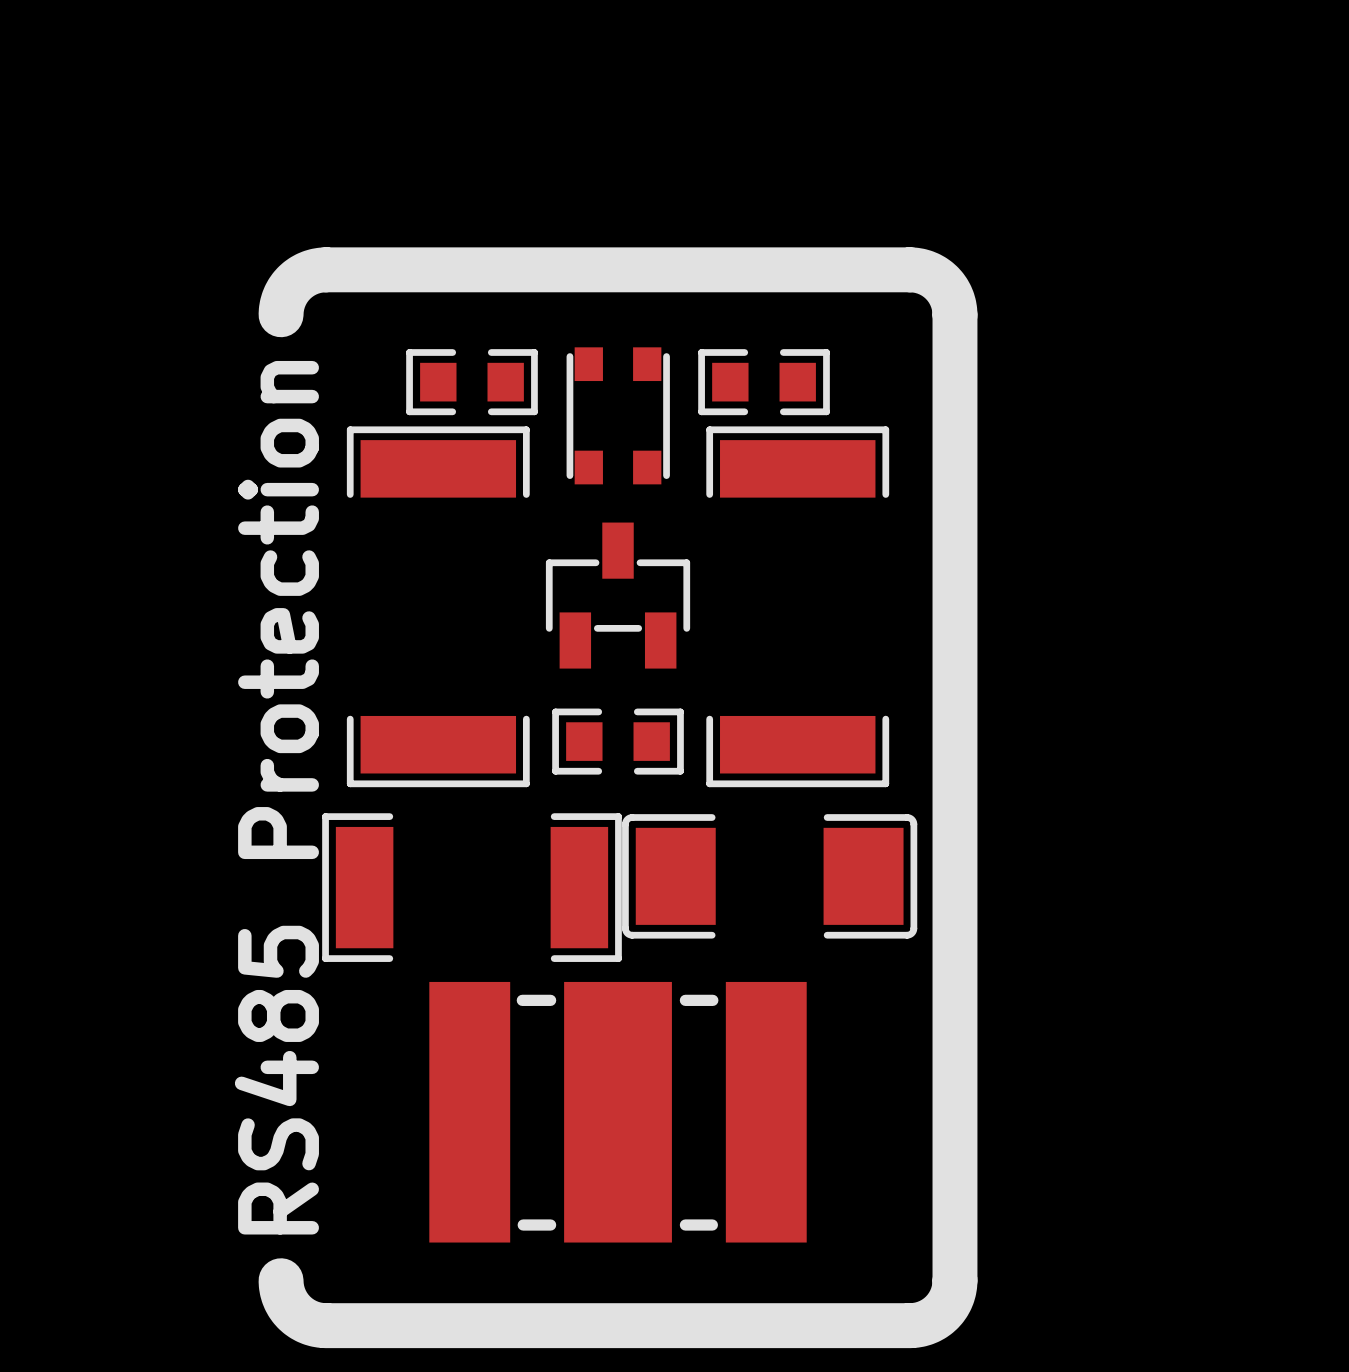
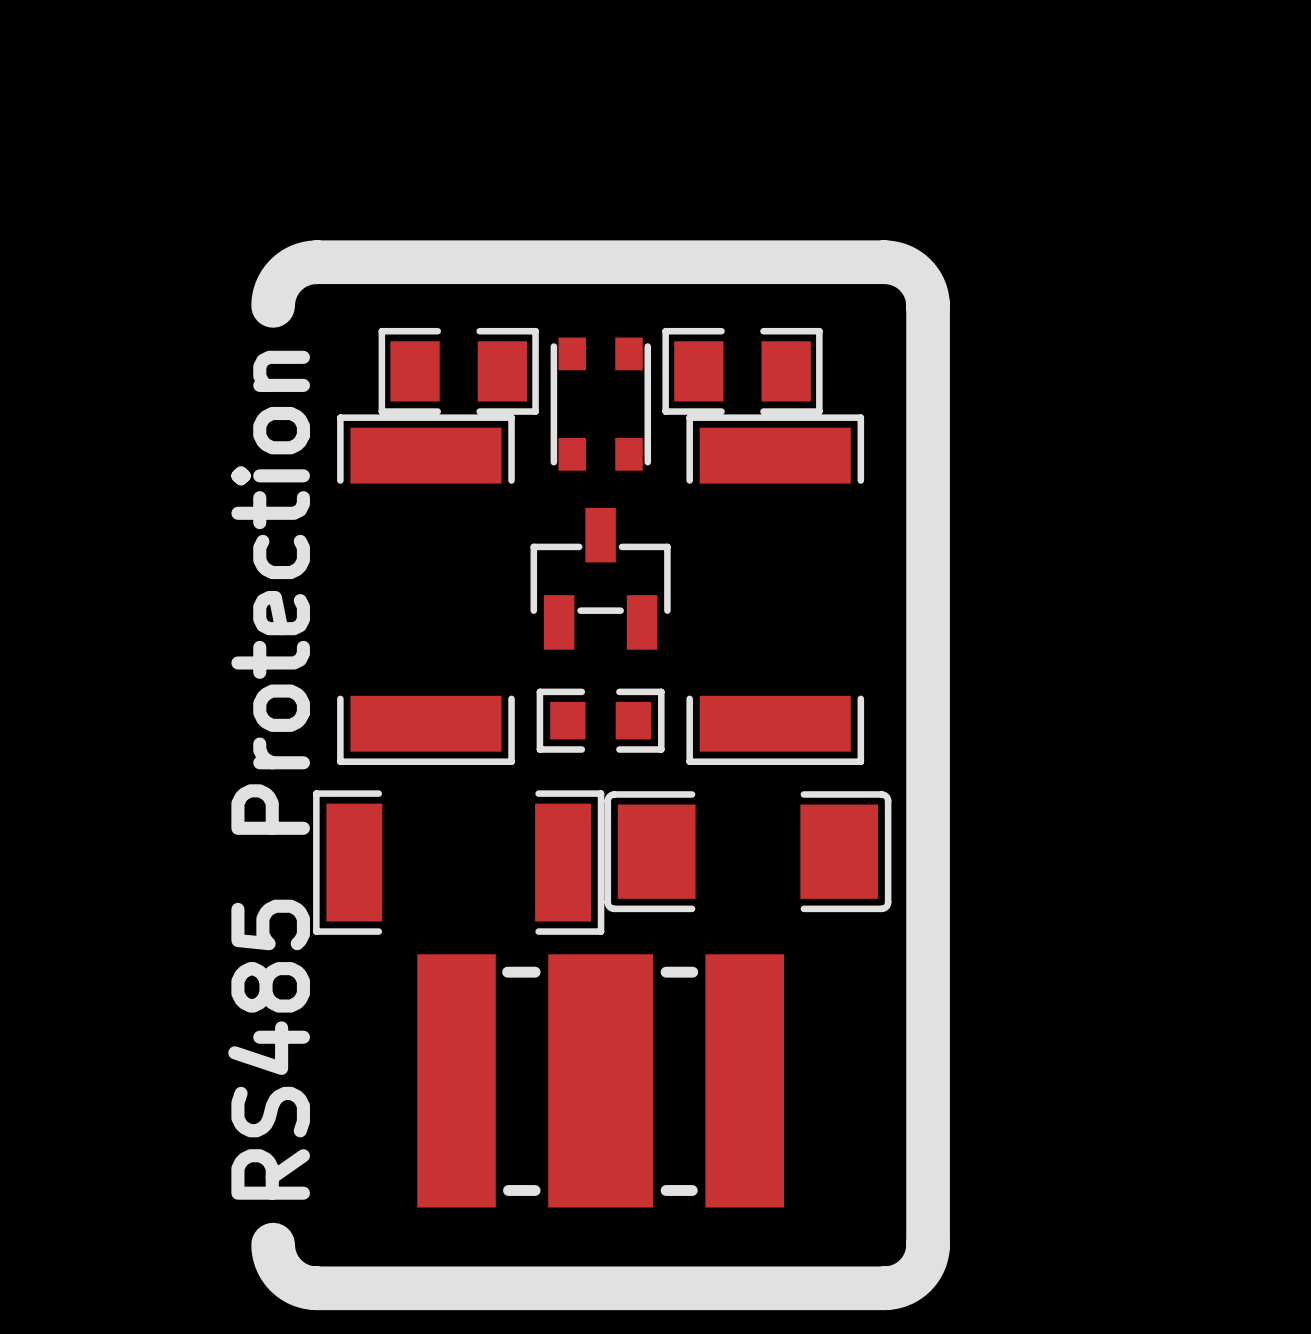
part footprint: [406, 349, 538, 416] -> [378, 327, 539, 415]
part footprint: [698, 349, 830, 416] -> [662, 327, 823, 415]

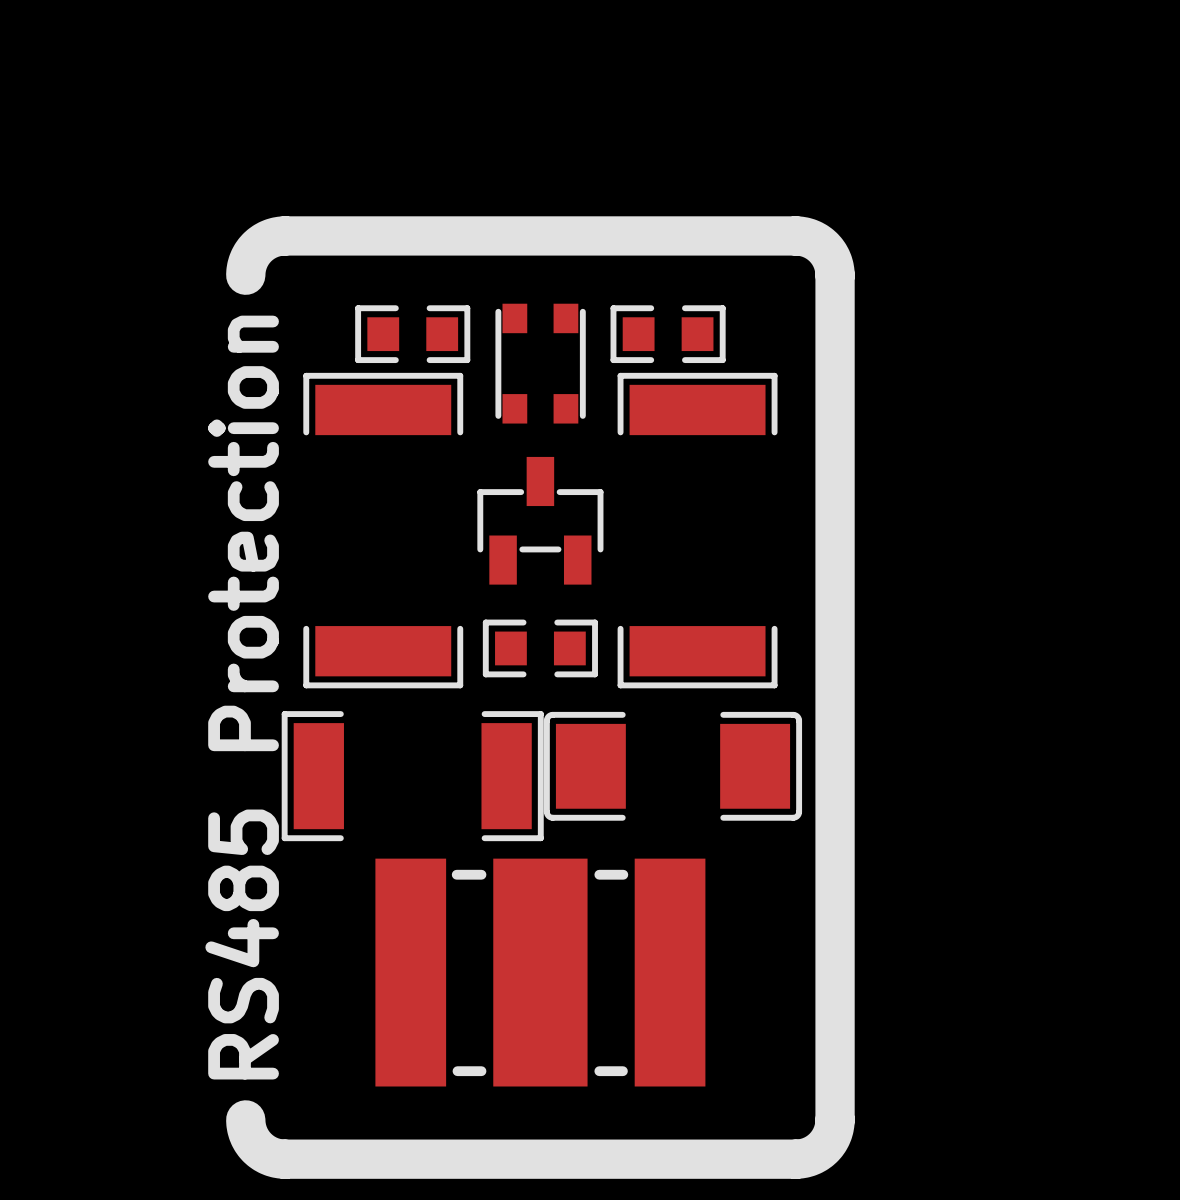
part footprint: [378, 327, 539, 415] -> [355, 305, 471, 364]
part footprint: [662, 327, 823, 415] -> [610, 305, 726, 364]

